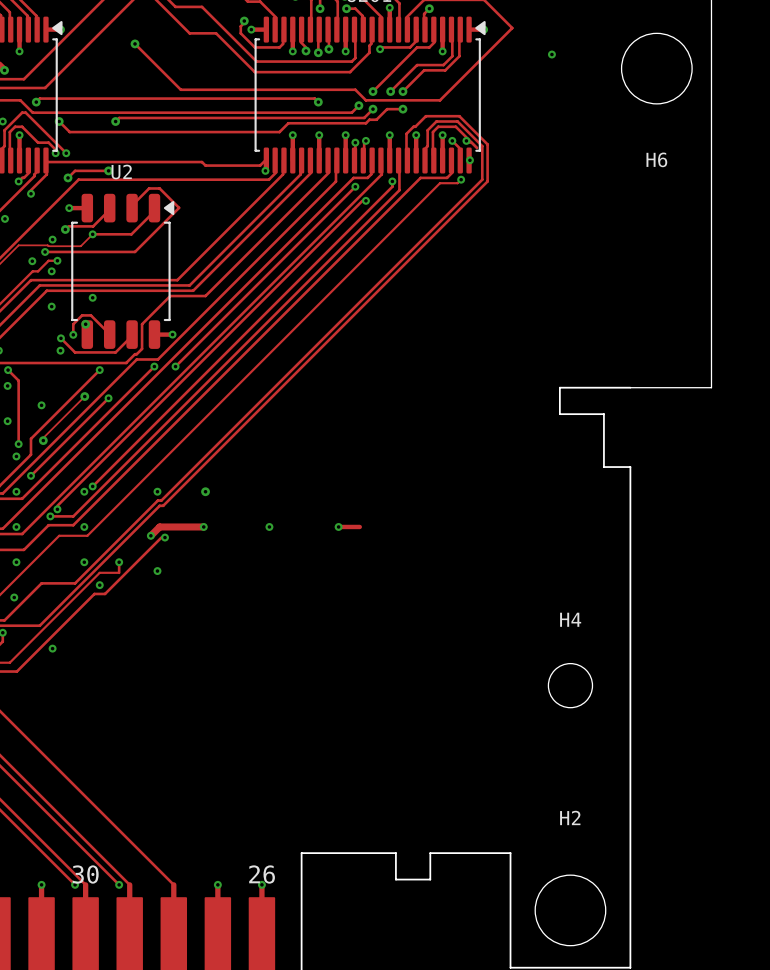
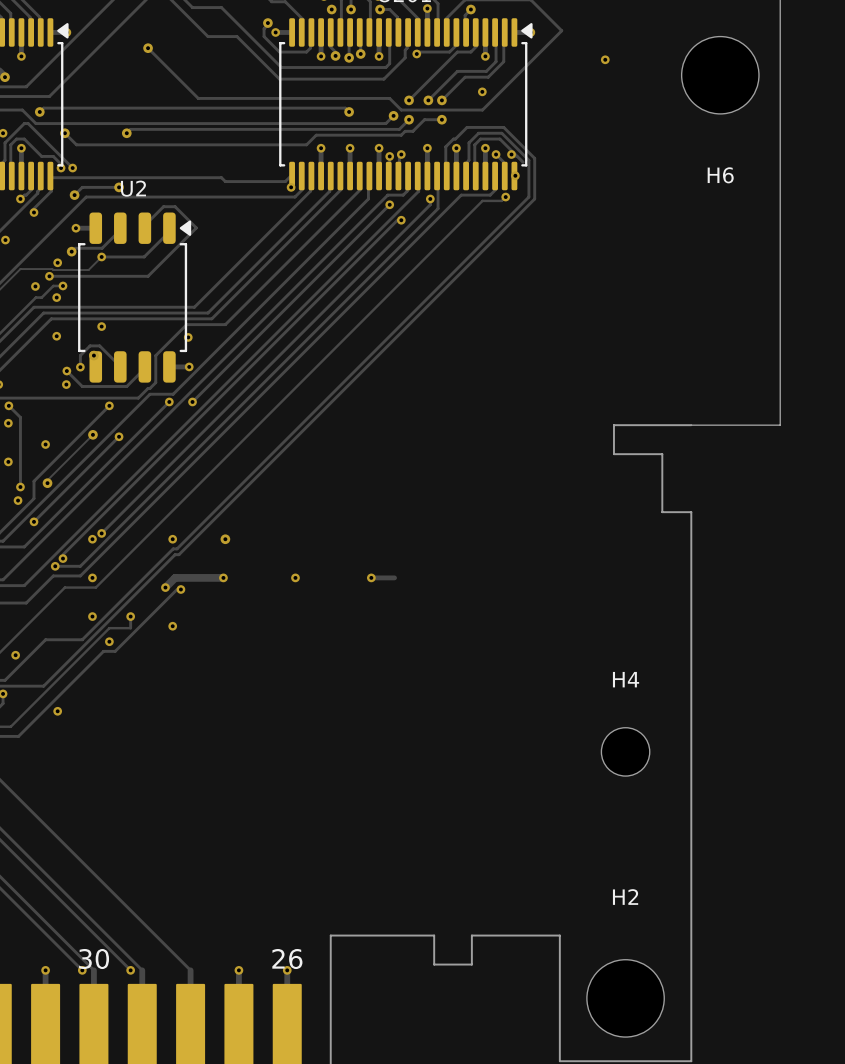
via: none -> (331, 9)
via: none -> (482, 91)
via: none -> (188, 337)
via: (16, 491) -> none
via: (16, 526) -> none
via: (16, 562) -> none

